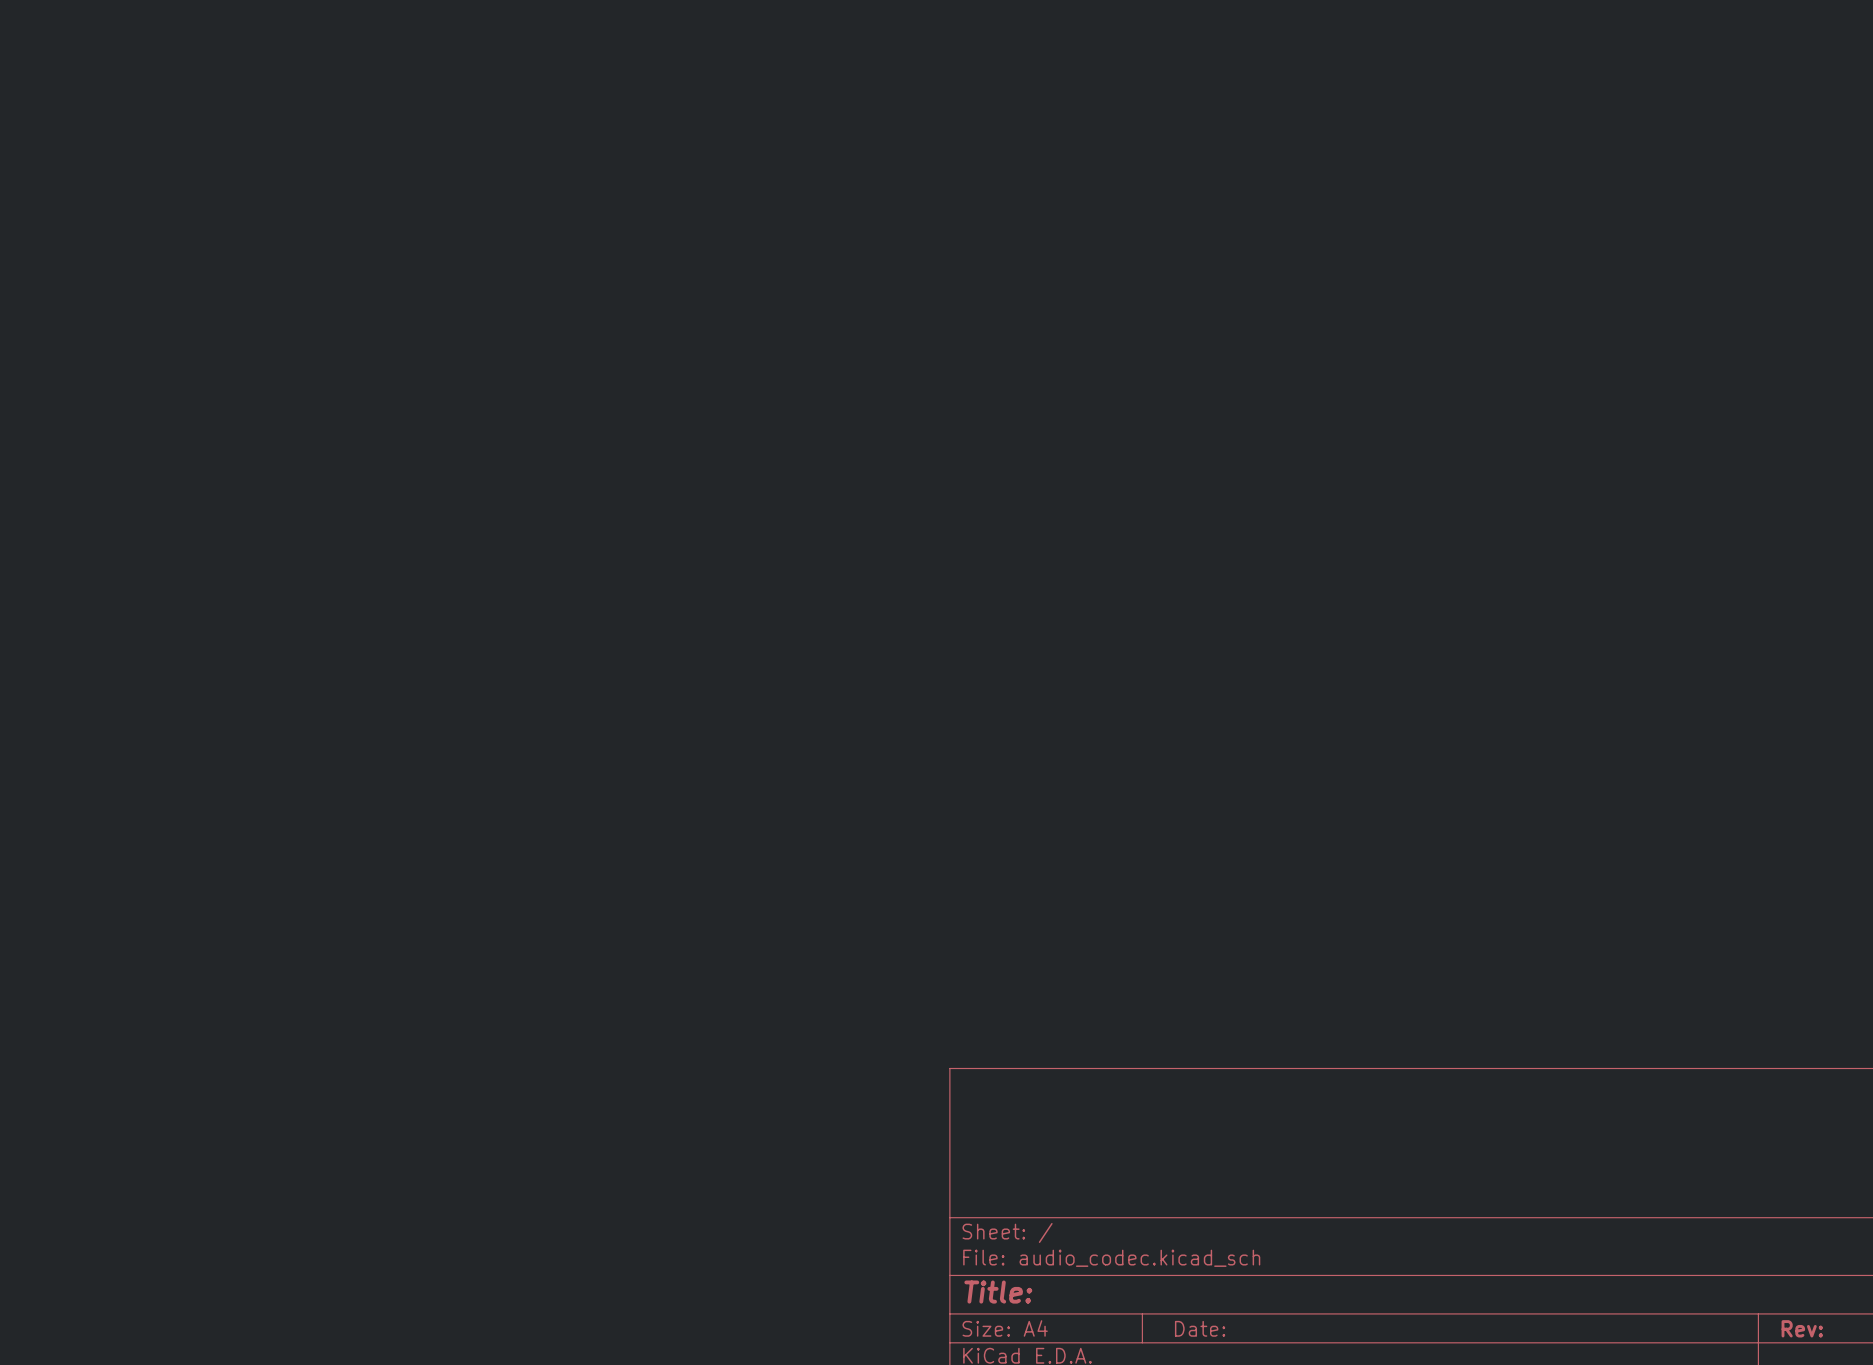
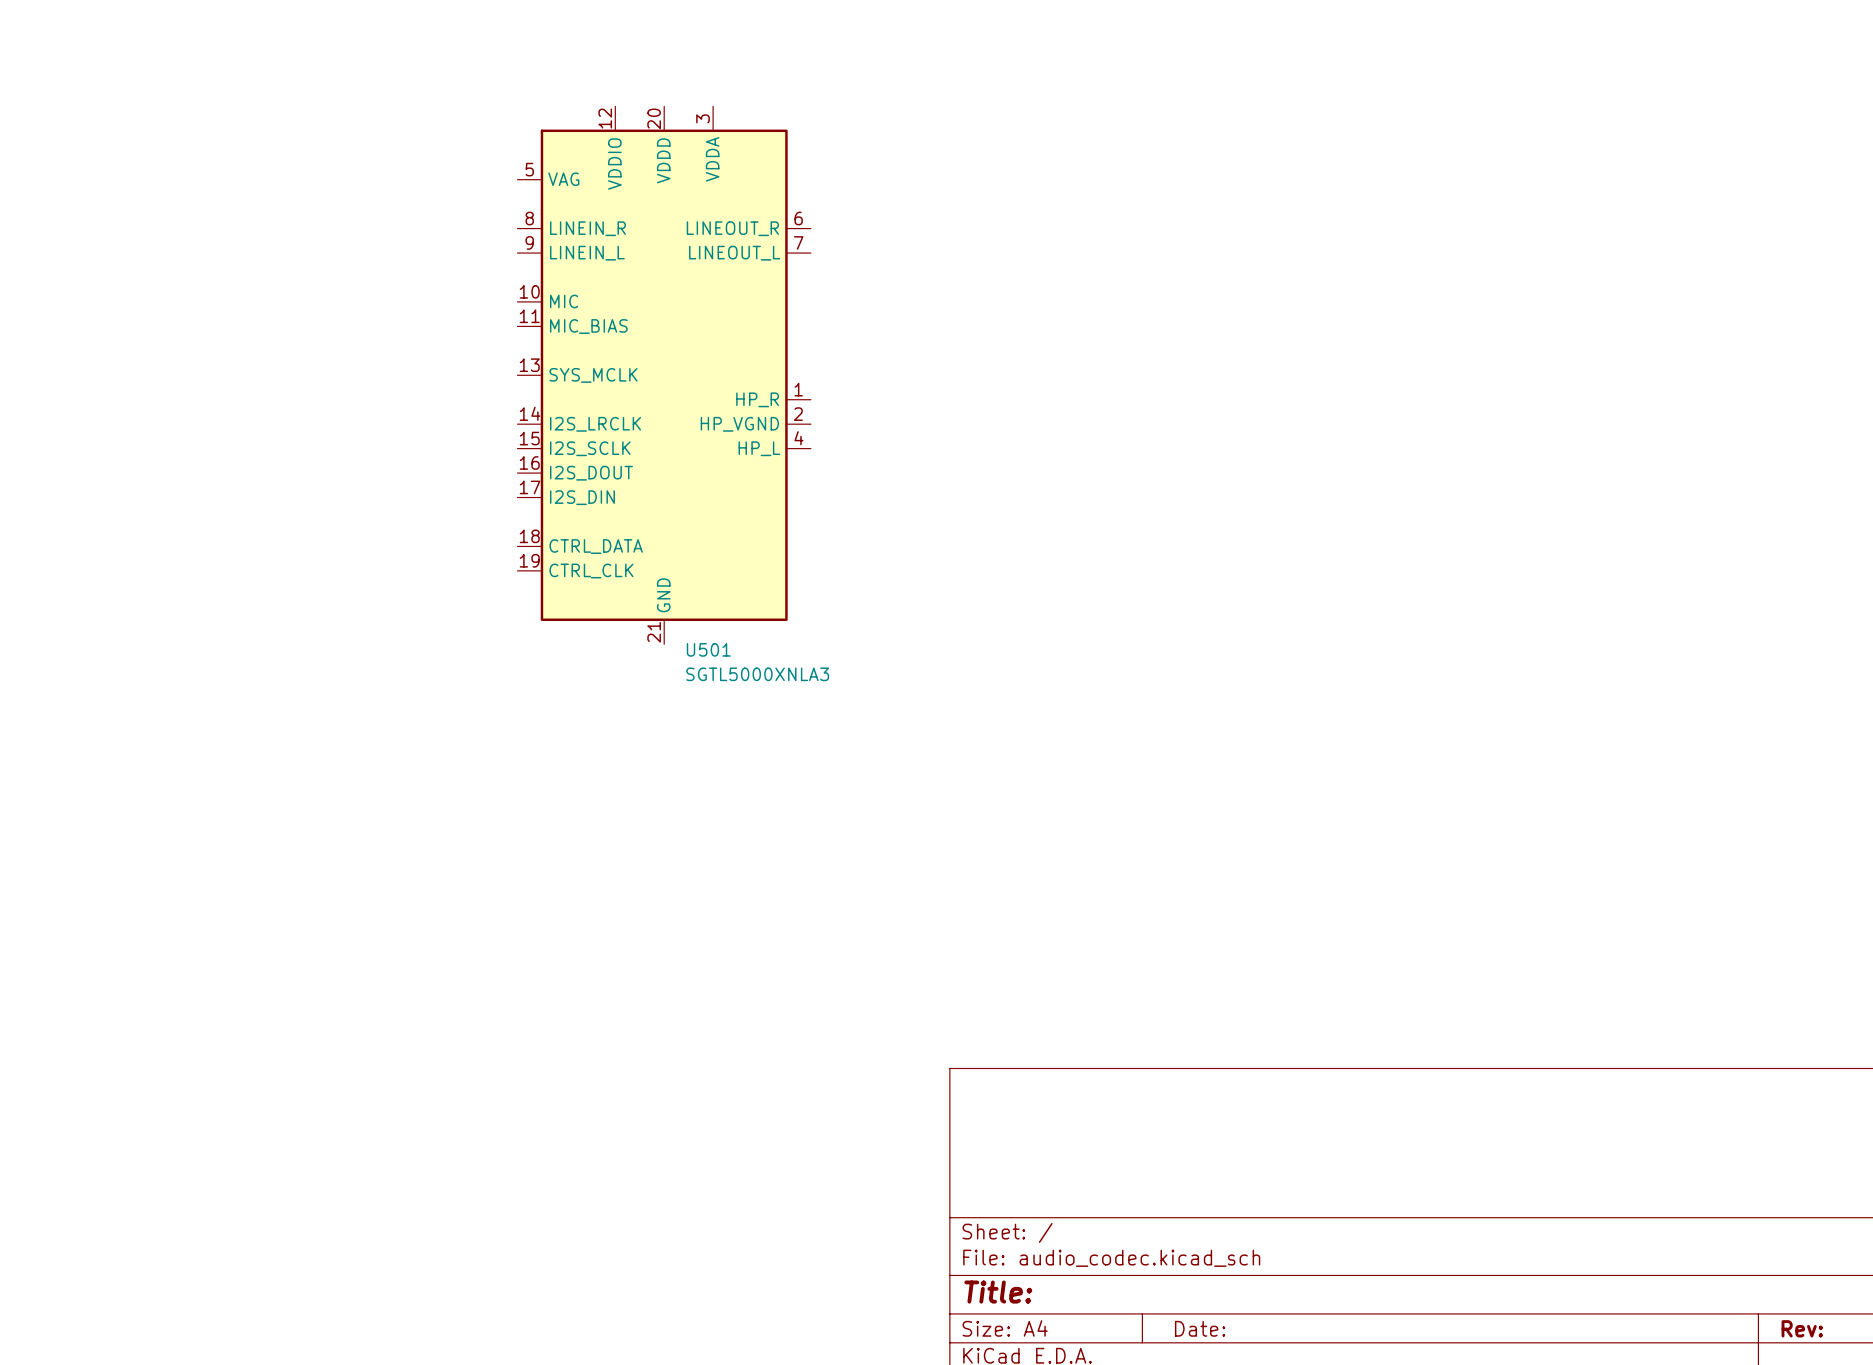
U501: none -> SGTL5000XNLA3 (664, 375)

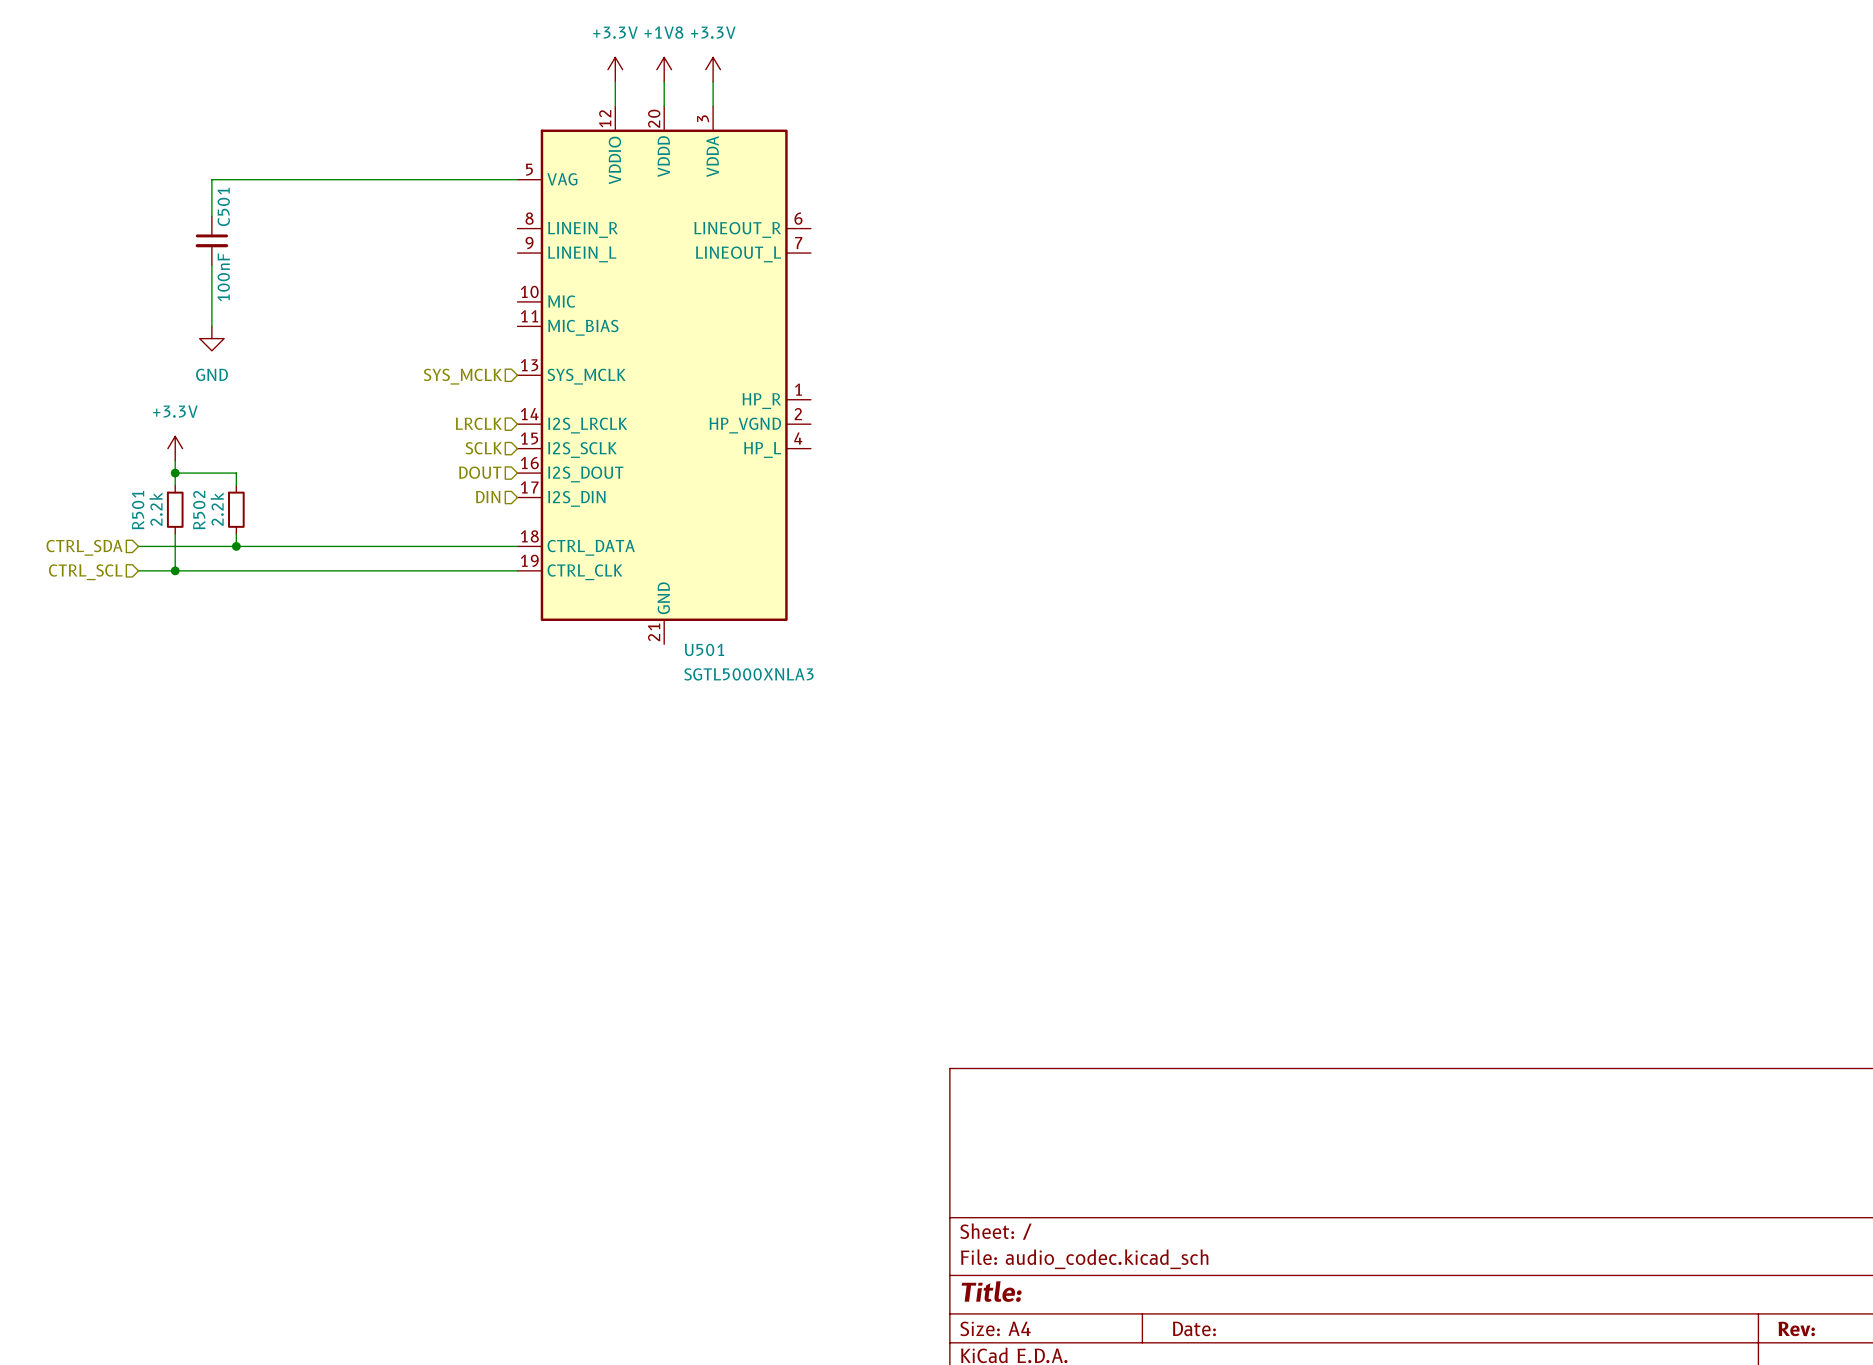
power symbol: none -> +3.3V (615, 69)
power symbol: none -> +1V8 (664, 69)
power symbol: none -> +3.3V (713, 69)
wire: none -> (615, 81) (615, 106)
wire: none -> (664, 81) (664, 106)
wire: none -> (713, 81) (713, 106)
wire: none -> (517, 179) (211, 179) (211, 216)
C501: none -> 100nF (211, 240)
wire: none -> (211, 265) (211, 326)
power symbol: none -> GND (211, 338)
hierarchical label: none -> SYS_MCLK (462, 376)
hierarchical label: none -> LRCLK (478, 423)
power symbol: none -> +3.3V (175, 448)
hierarchical label: none -> SCLK (483, 448)
wire: none -> (175, 460) (175, 485)
hierarchical label: none -> DOUT (480, 472)
wire: none -> (175, 473) (236, 473) (236, 485)
junction: none -> (175, 473)
hierarchical label: none -> DIN (488, 497)
R501: none -> 2.2k (175, 509)
R502: none -> 2.2k (236, 509)
wire: none -> (175, 534) (175, 570)
wire: none -> (236, 534) (236, 546)
hierarchical label: none -> CTRL_SDA (84, 547)
wire: none -> (138, 546) (517, 546)
junction: none -> (236, 546)
hierarchical label: none -> CTRL_SCL (85, 572)
wire: none -> (138, 570) (517, 570)
junction: none -> (175, 570)

